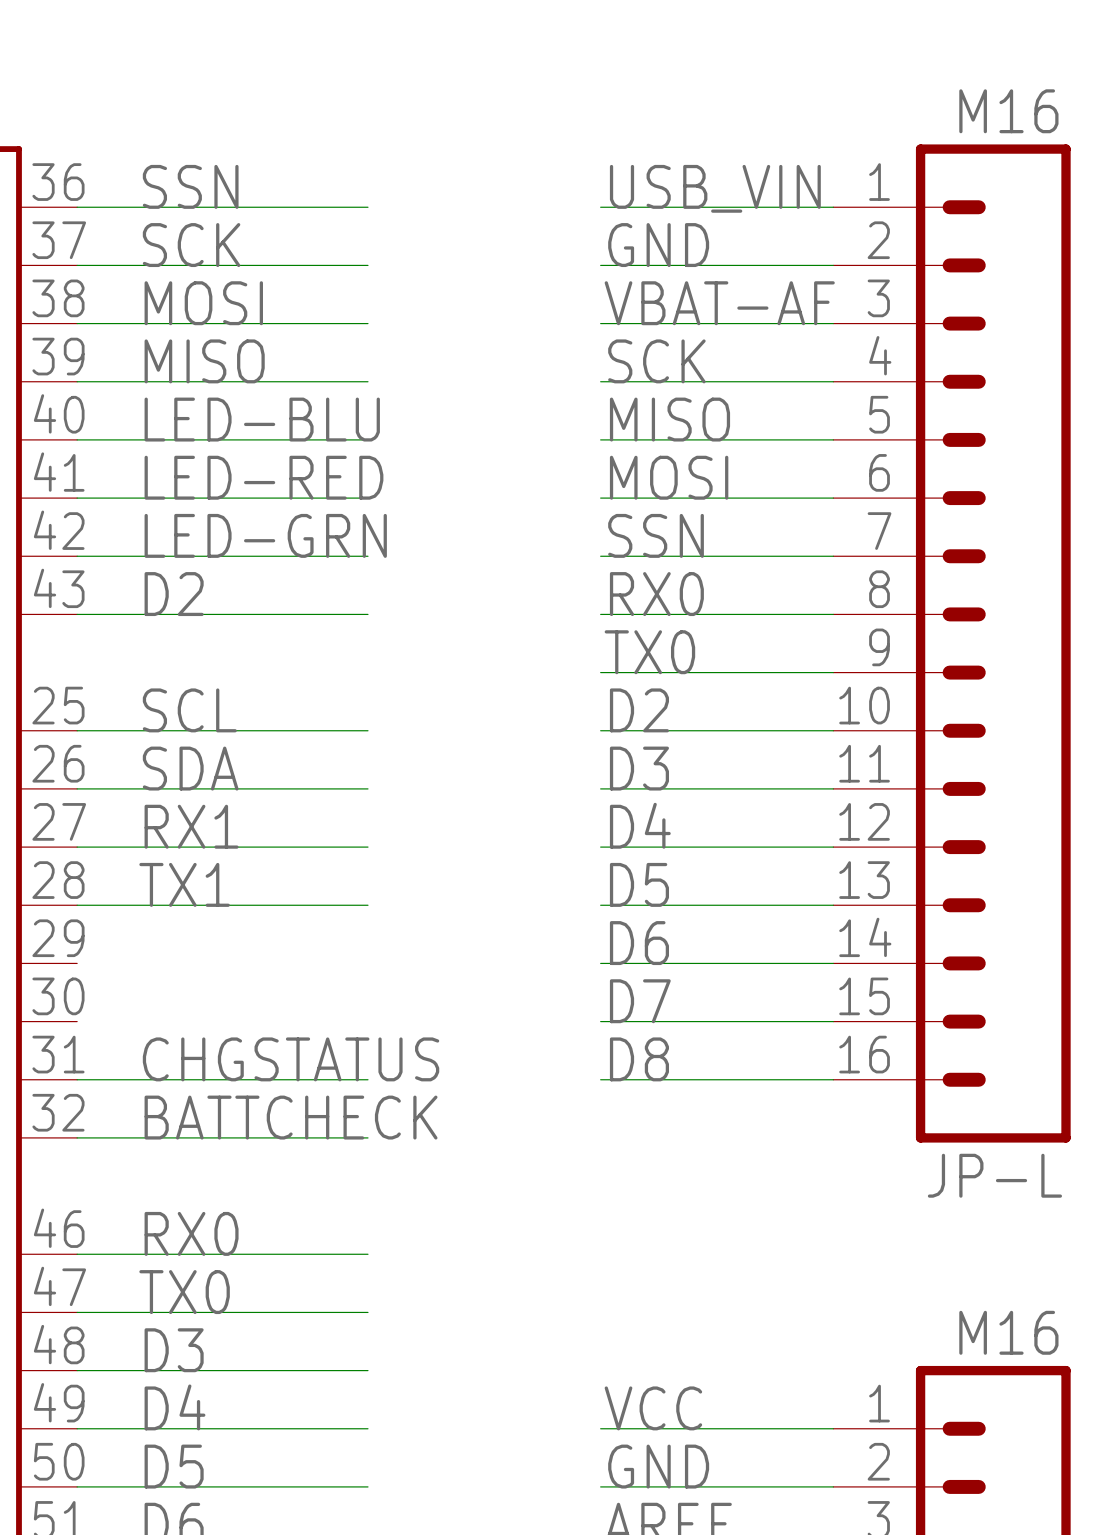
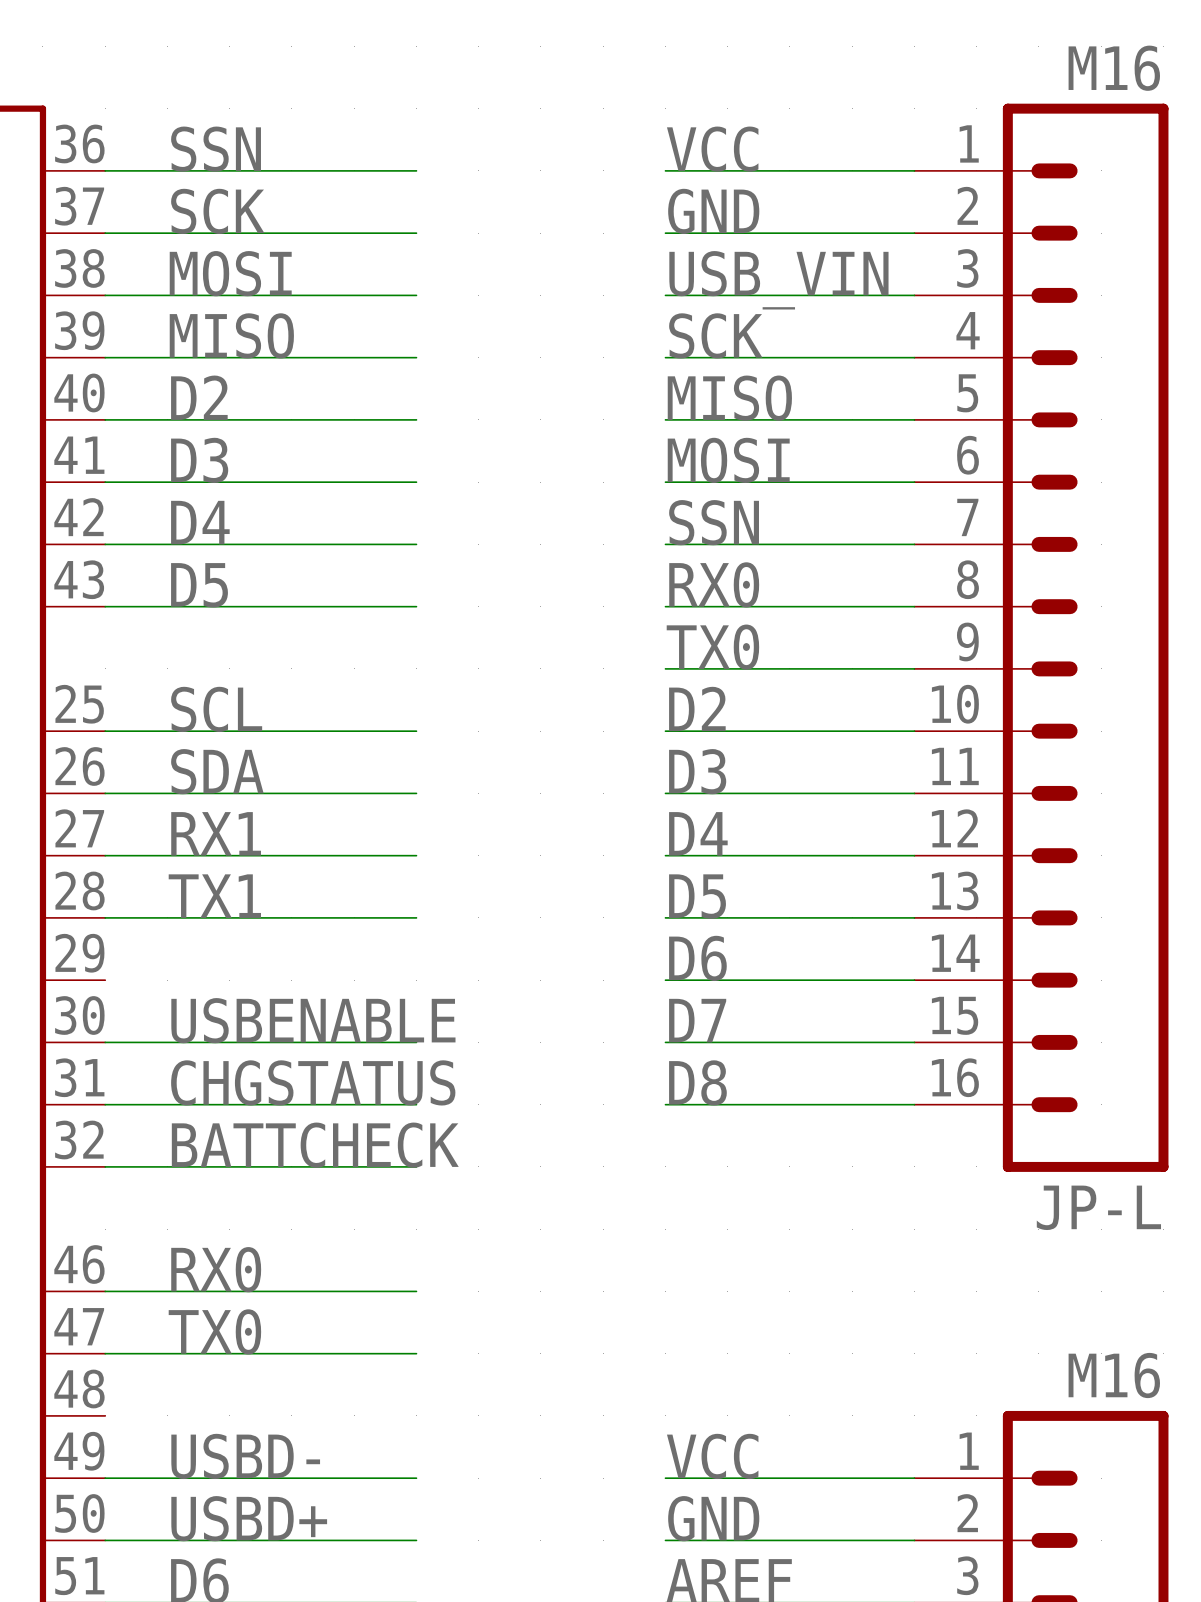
label: USB_VIN (715, 188) -> VCC (712, 149)
label: VBAT-AF (719, 303) -> USB_VIN (778, 280)
label: LED-BLU (262, 419) -> D2 (199, 397)
label: LED-RED (263, 477) -> D3 (199, 460)
label: LED-GRN (265, 535) -> D4 (200, 522)
label: D2 (174, 594) -> D5 (199, 585)
label: none -> USBENABLE (313, 1020)
label: D3 (174, 1350) -> none
wire: (77, 1370) (367, 1370) -> (105, 1042) (416, 1042)
label: D4 (174, 1407) -> USBD- (245, 1456)
label: D5 (174, 1466) -> USBD+ (249, 1518)

